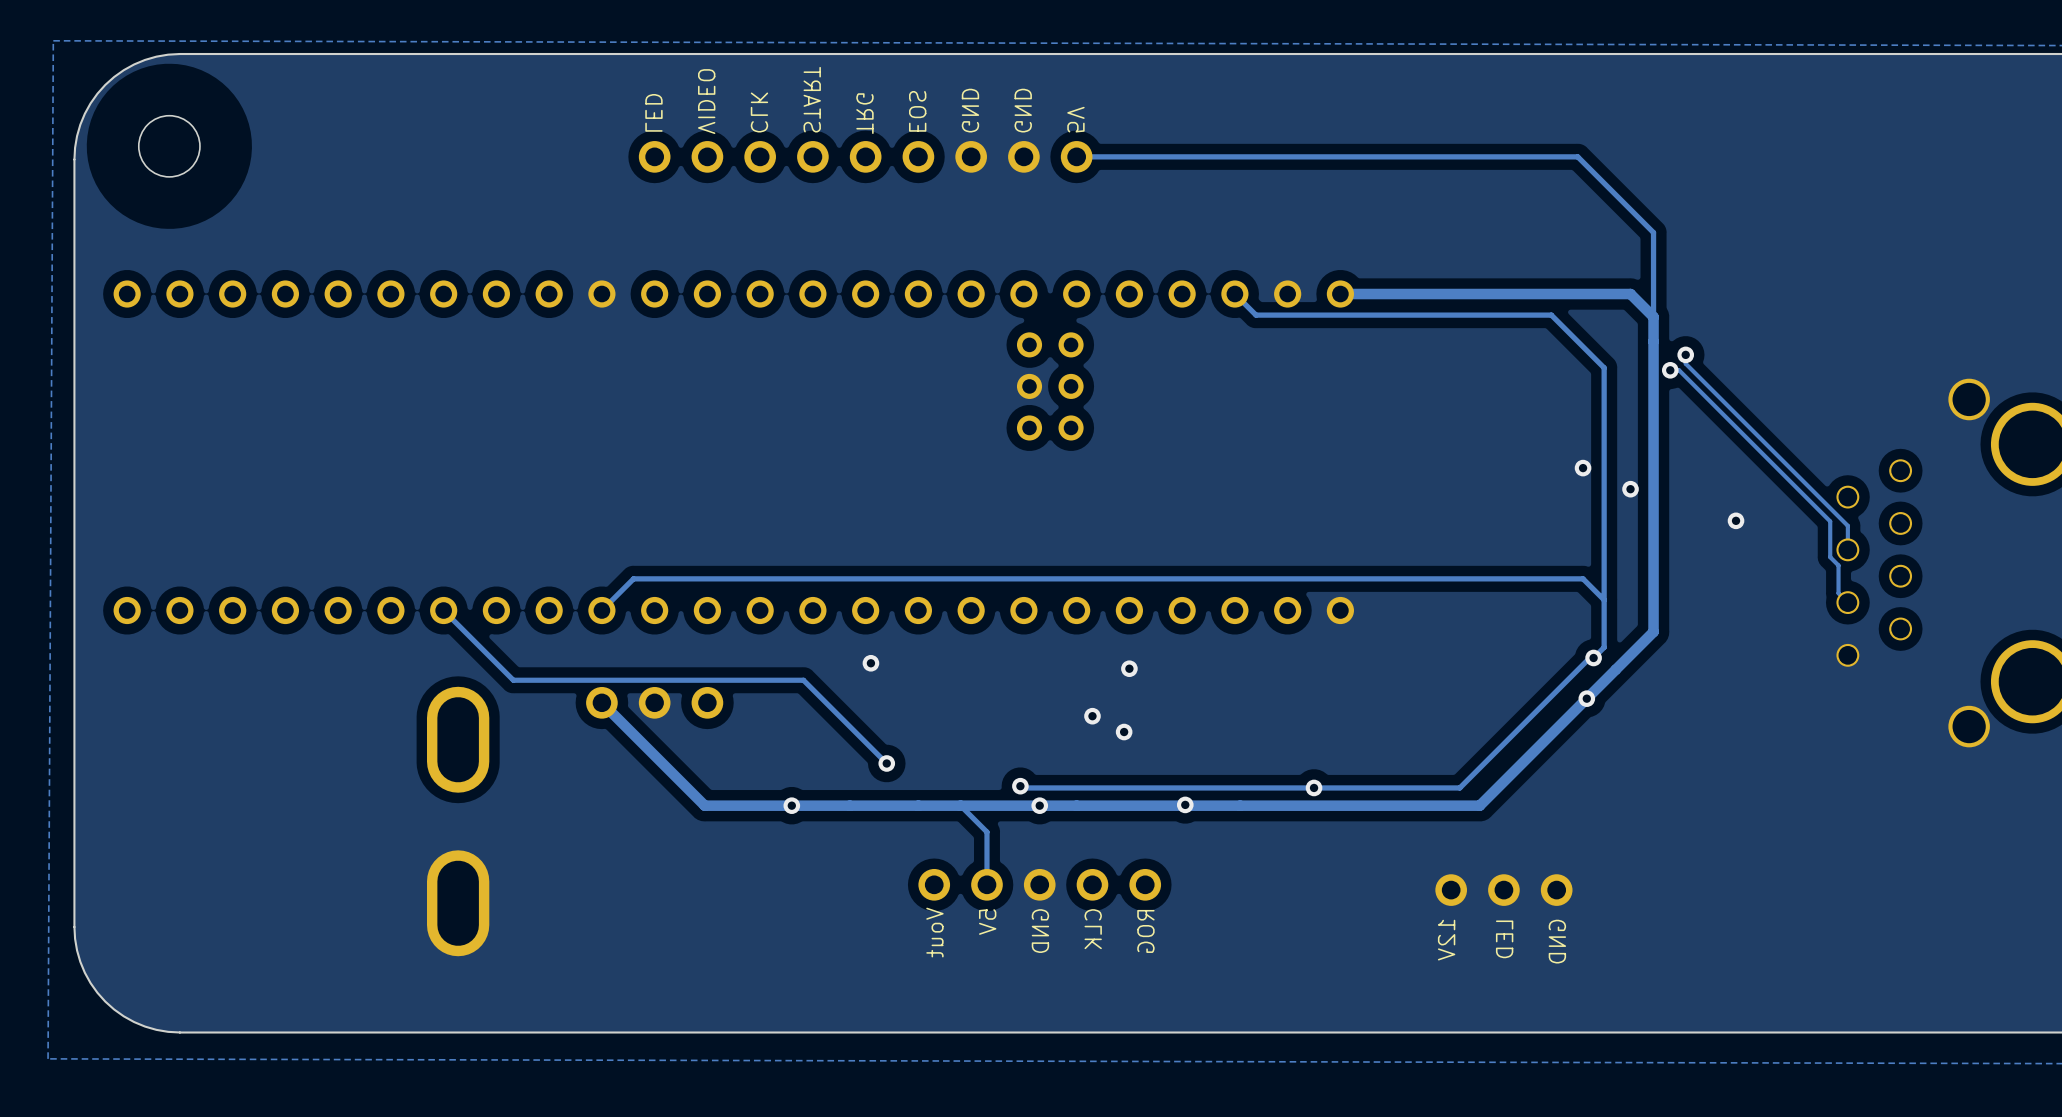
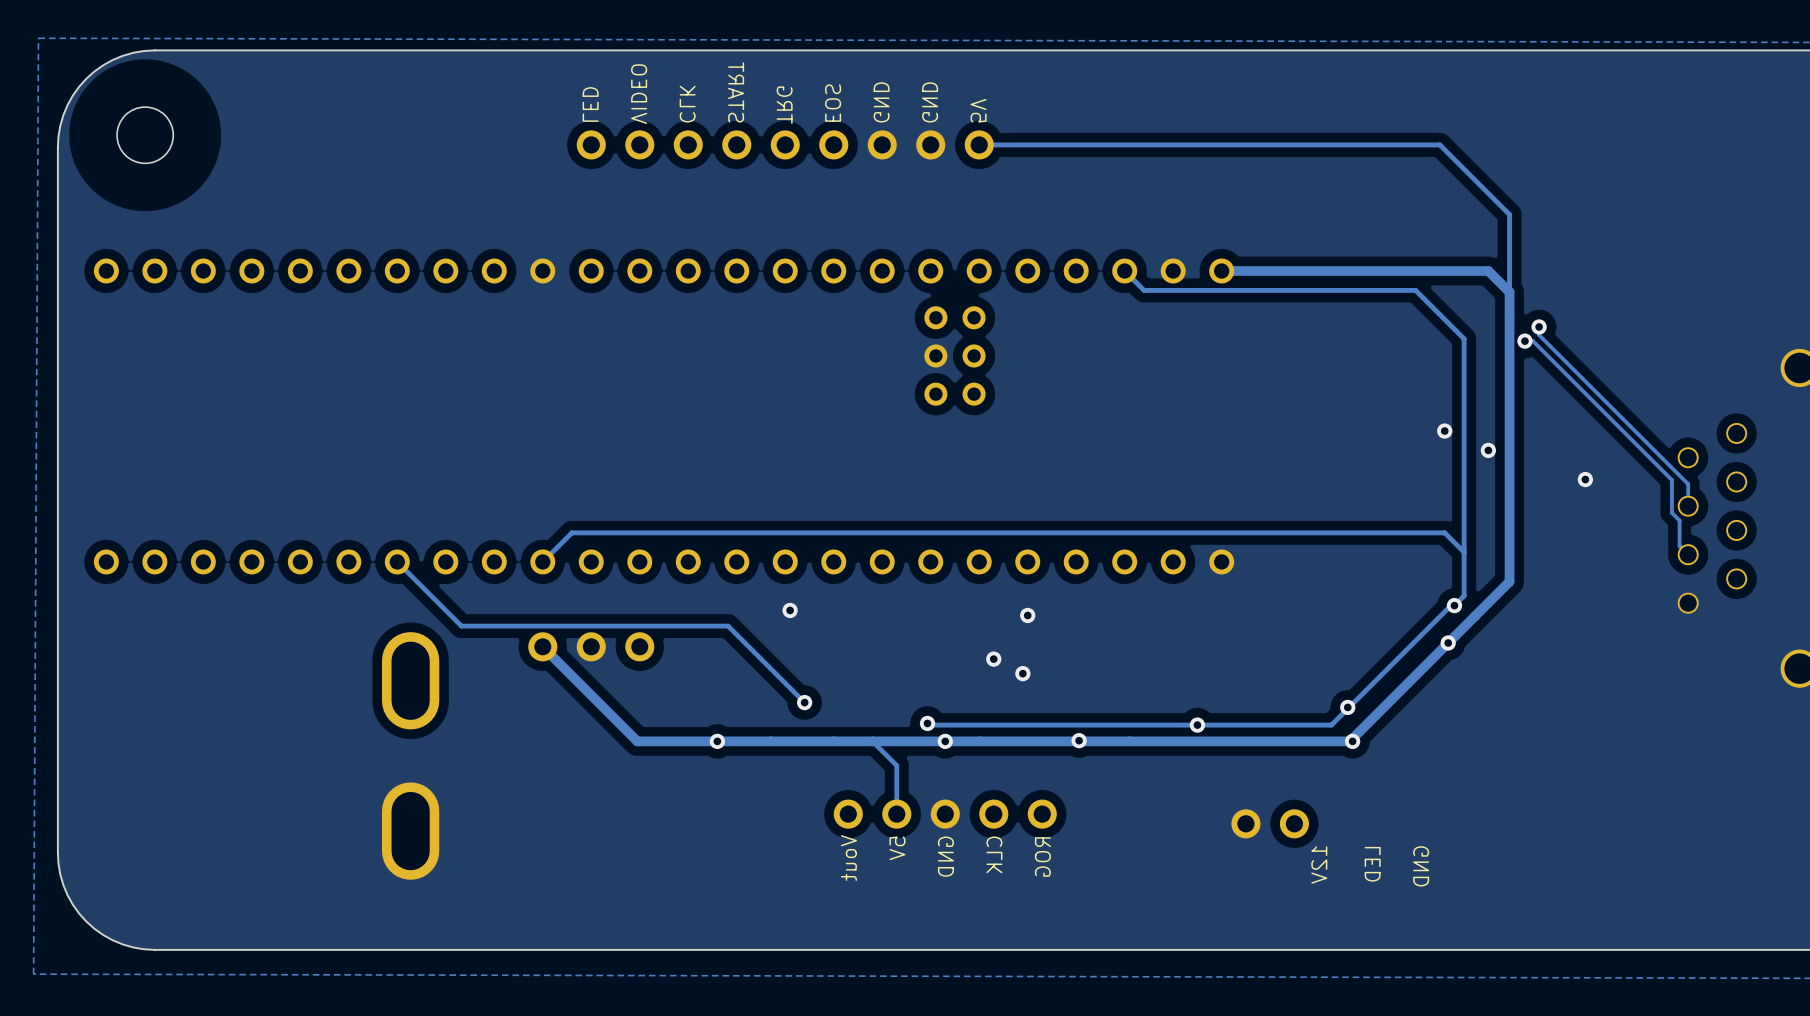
via: none -> (1347, 707)
via: none -> (1352, 741)
part: (1503, 890) -> none
part: none -> (1270, 823)

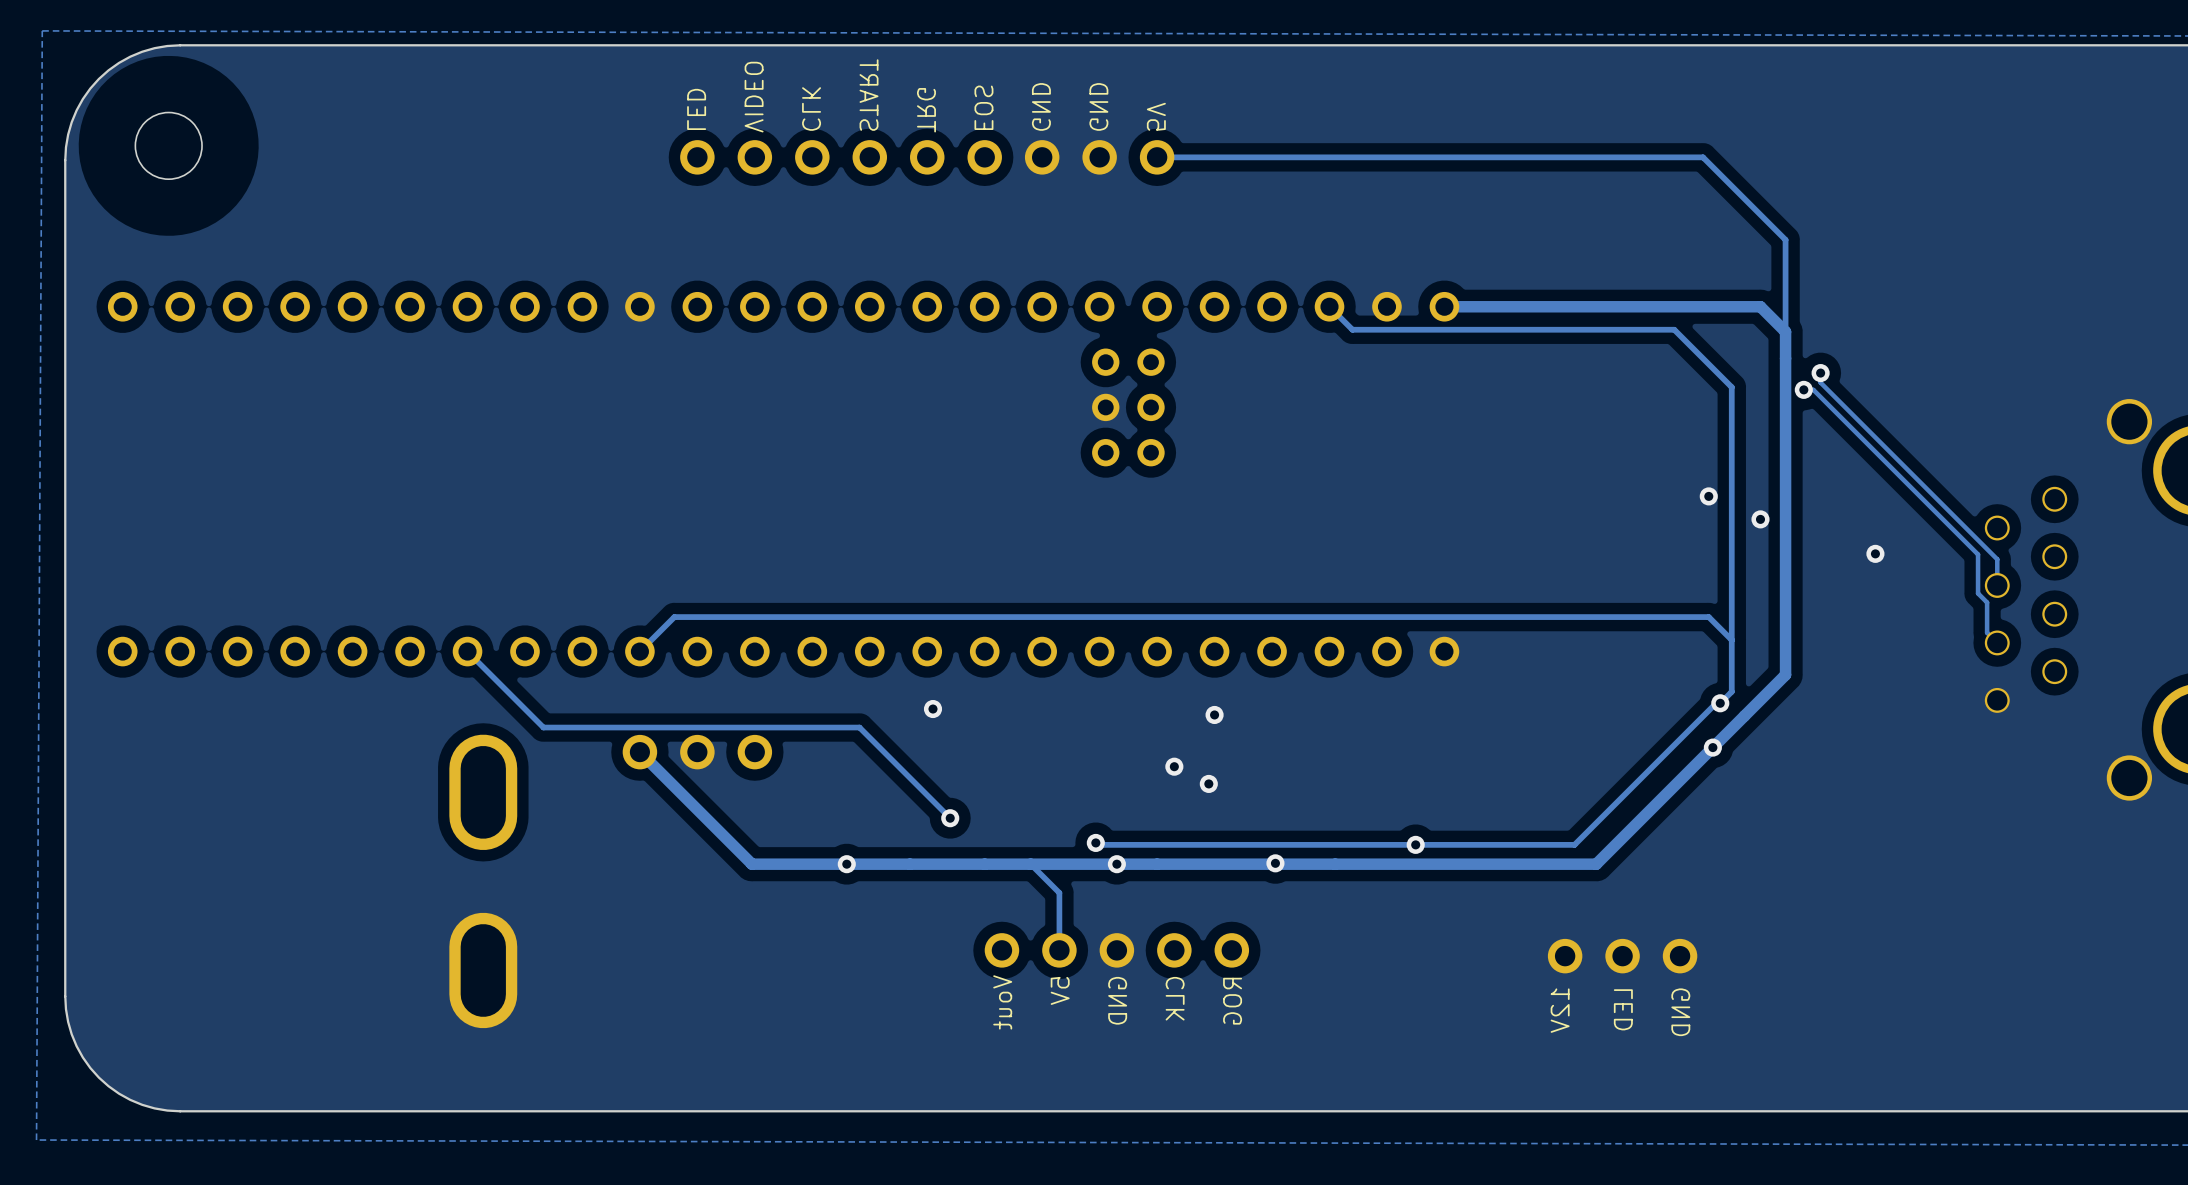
via: (1347, 707) -> none
via: (1352, 741) -> none
part: none -> (1622, 956)
part: (1270, 823) -> none

